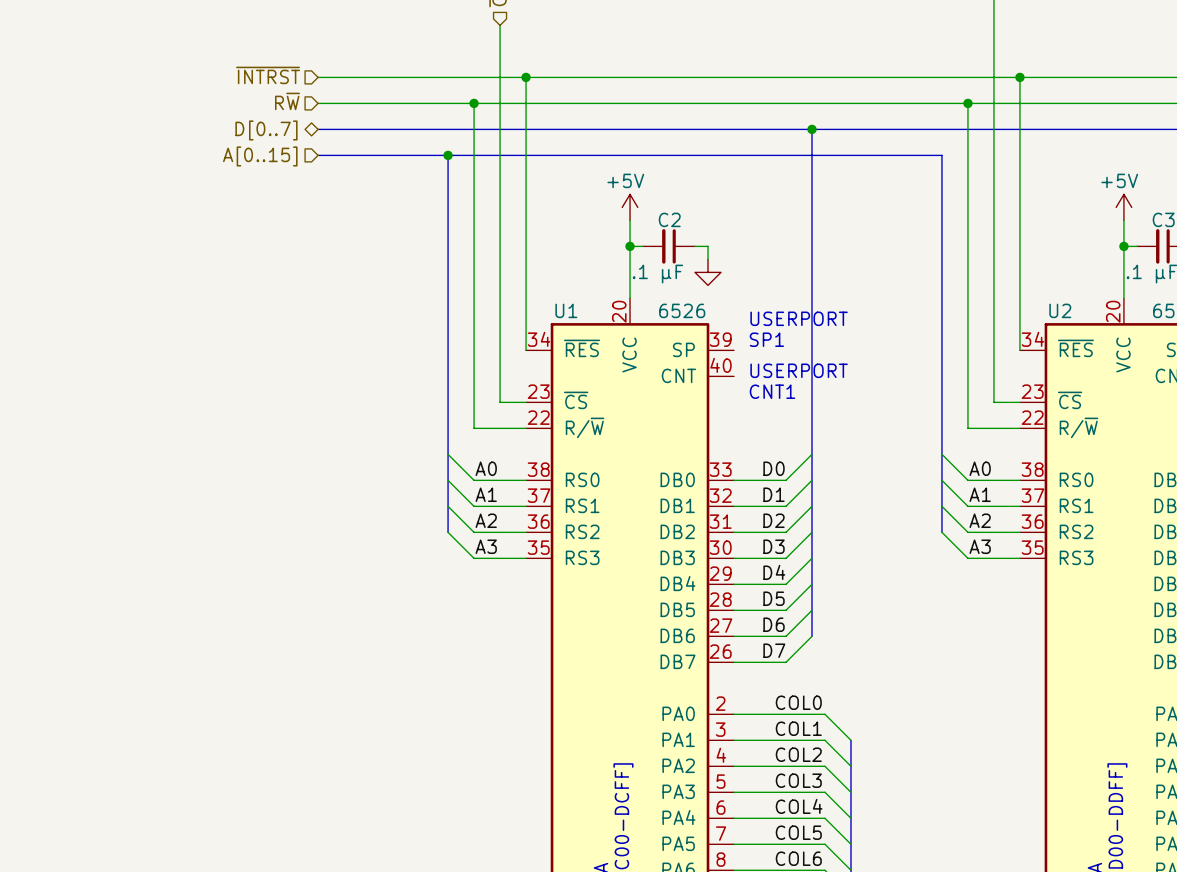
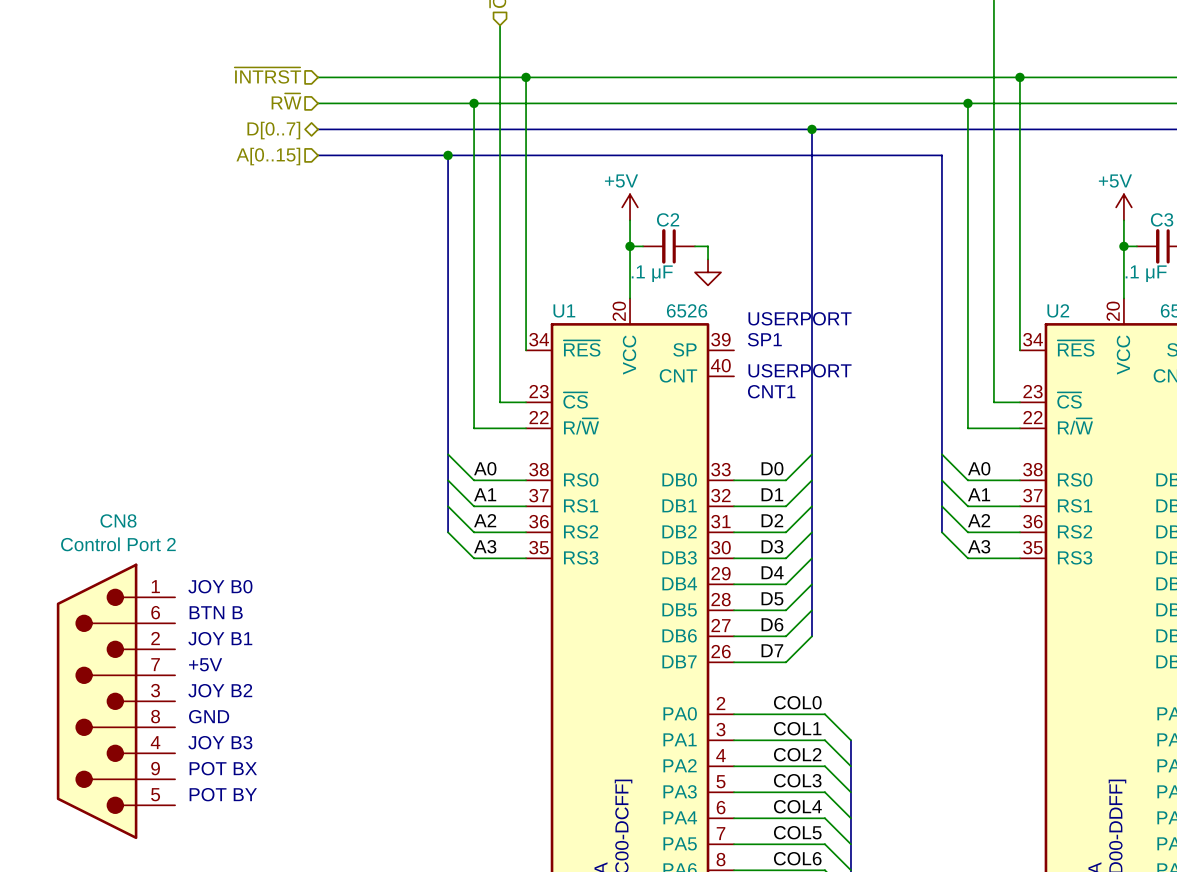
text: none -> JOY B0 (220, 586)
text: none -> BTN B (216, 612)
text: none -> JOY B1 (220, 638)
text: none -> +5V (205, 664)
text: none -> JOY B2 (220, 690)
CN8: none -> Control Port 2 (115, 701)
text: none -> GND (209, 716)
text: none -> JOY B3 (220, 742)
text: none -> POT BX (223, 768)
text: none -> POT BY (223, 794)

